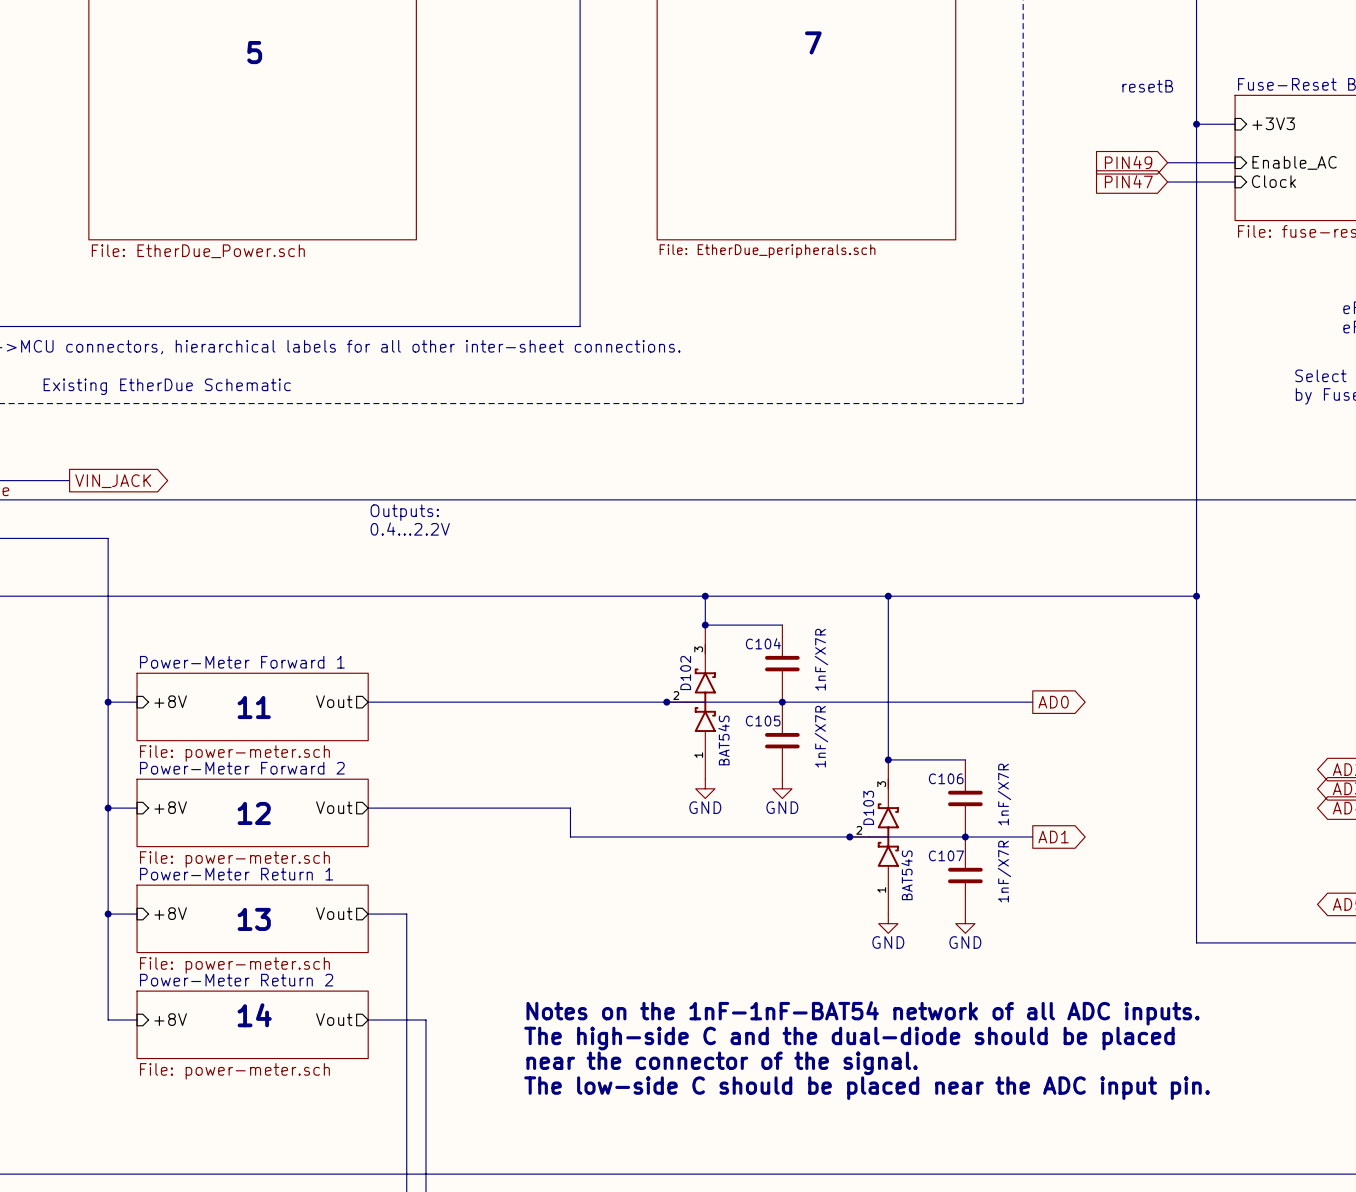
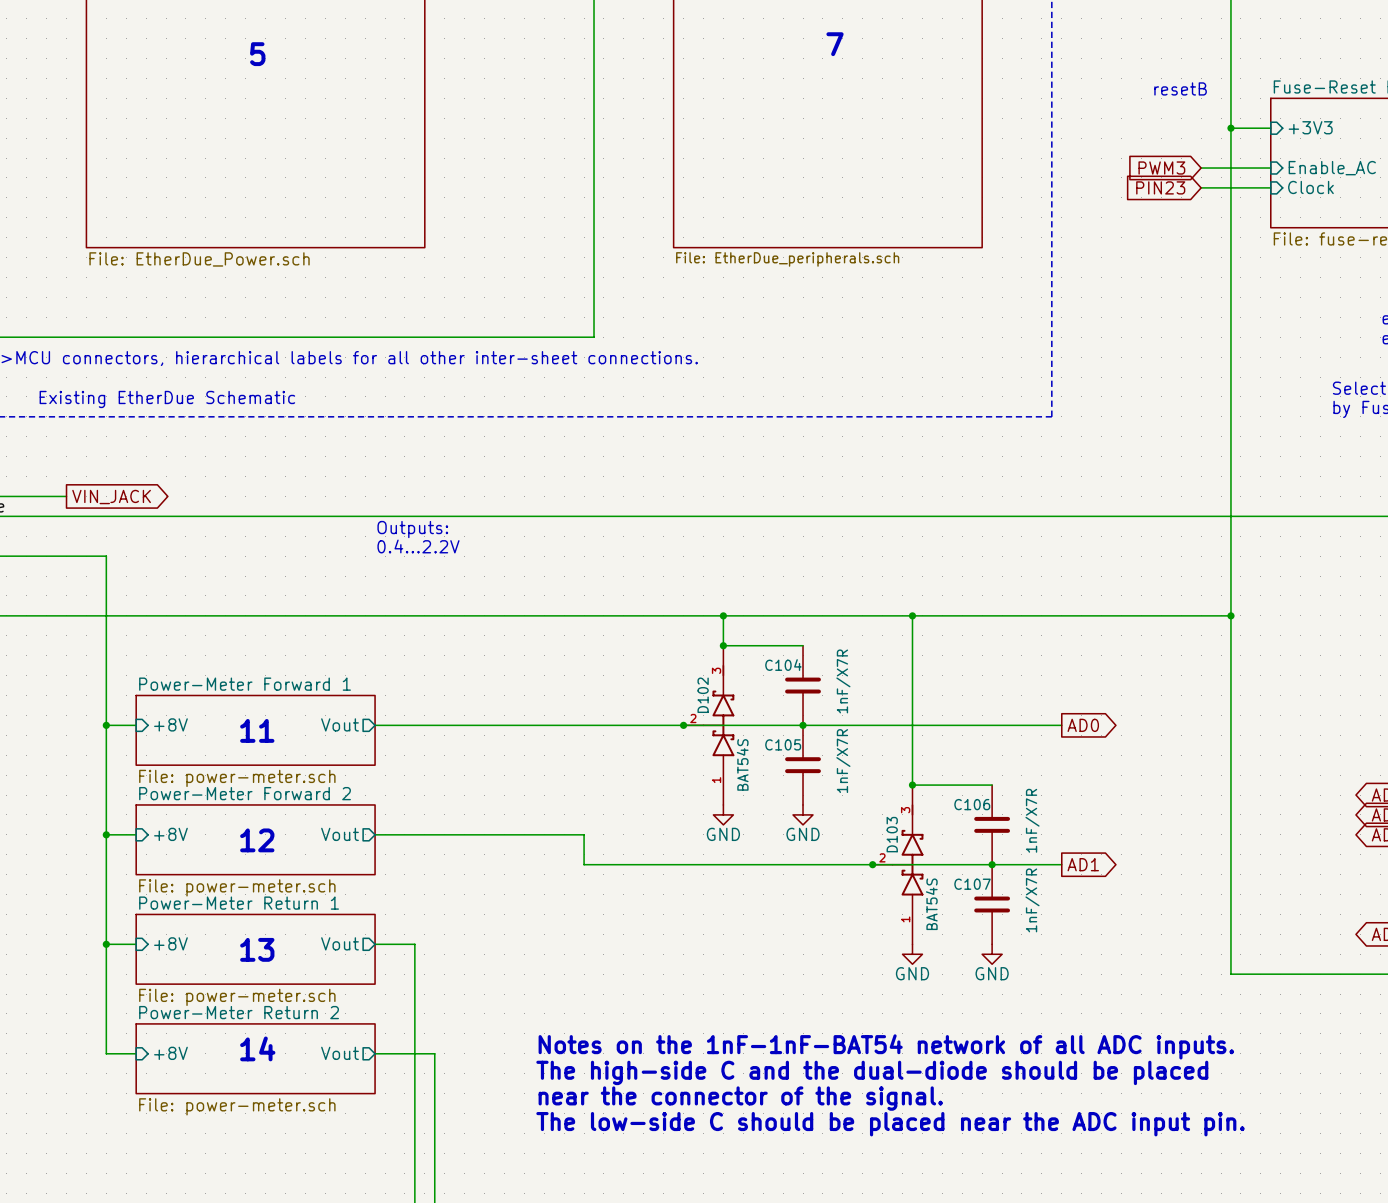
global label: PIN49 (1128, 162) -> PWM3 (1161, 168)
global label: PIN47 (1128, 181) -> PIN23 (1160, 187)

